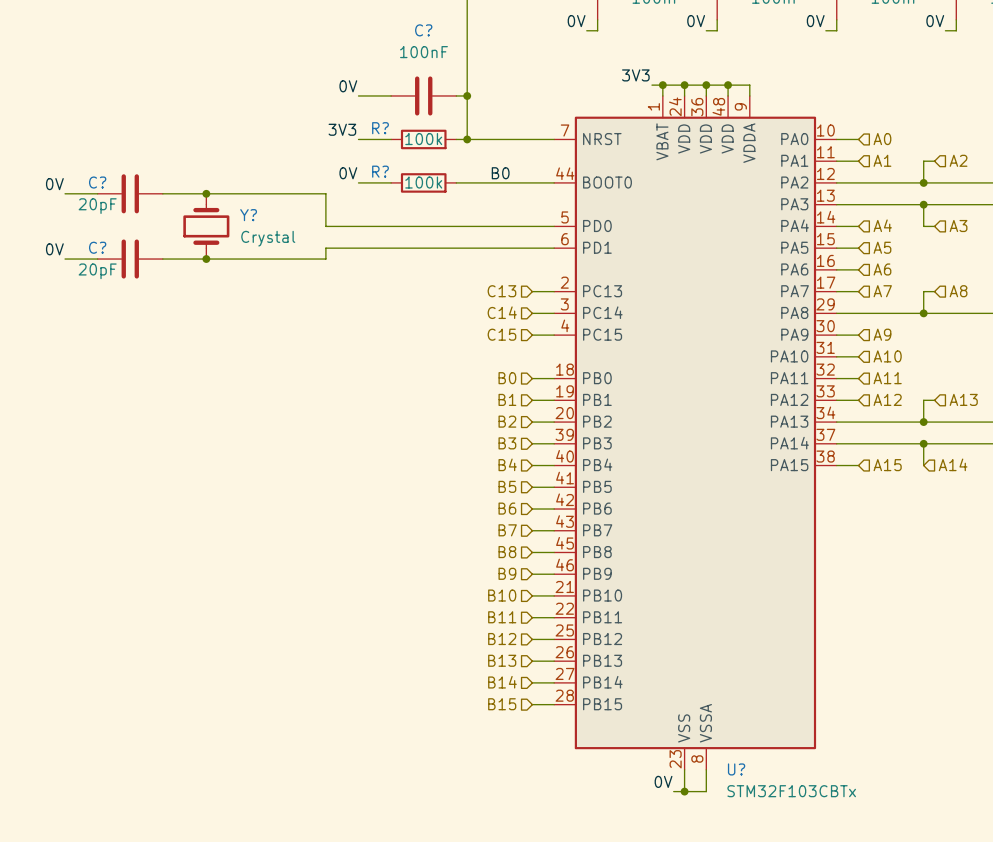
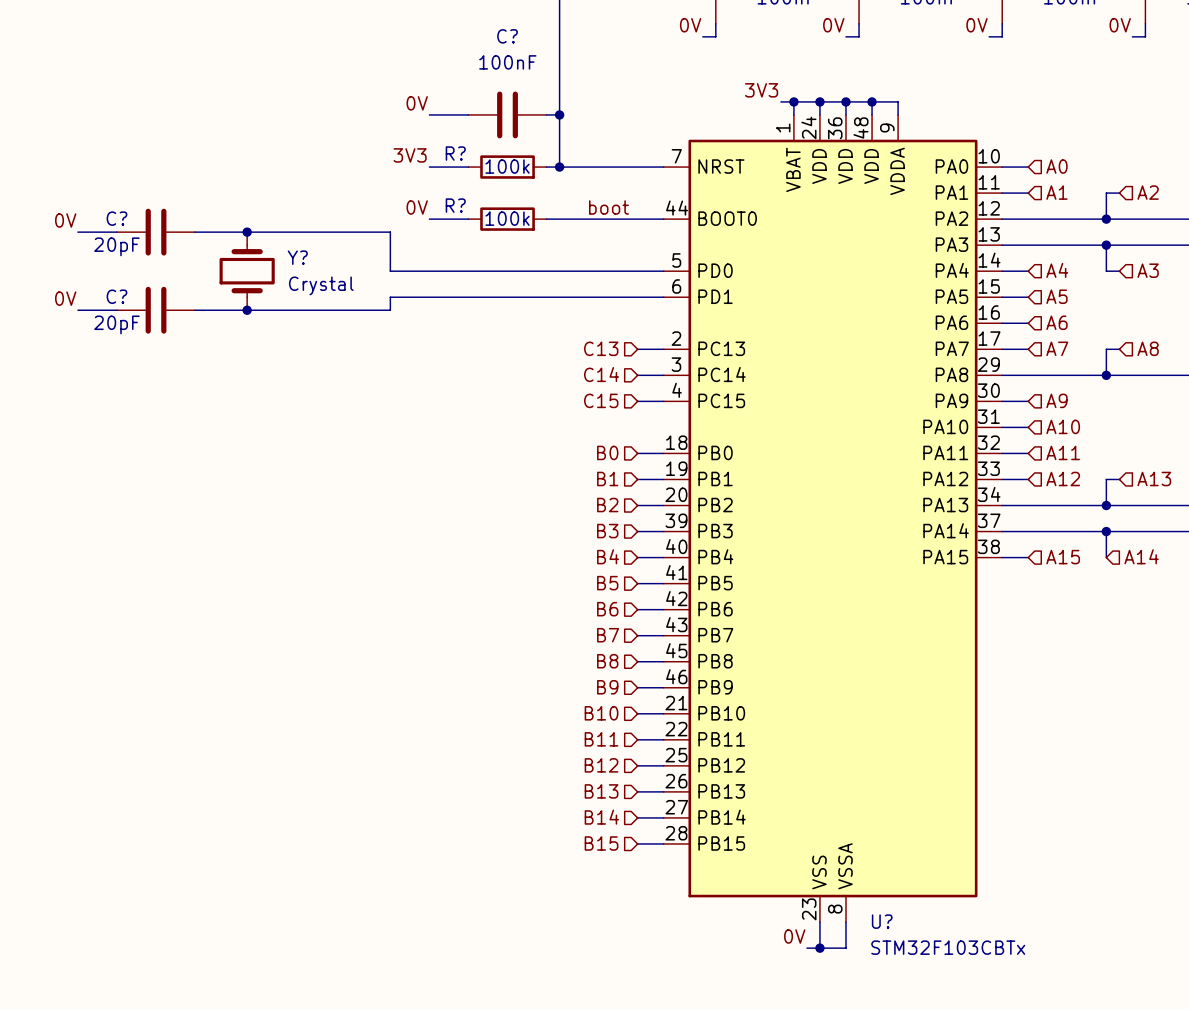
label: B0 (500, 173) -> boot (608, 207)

